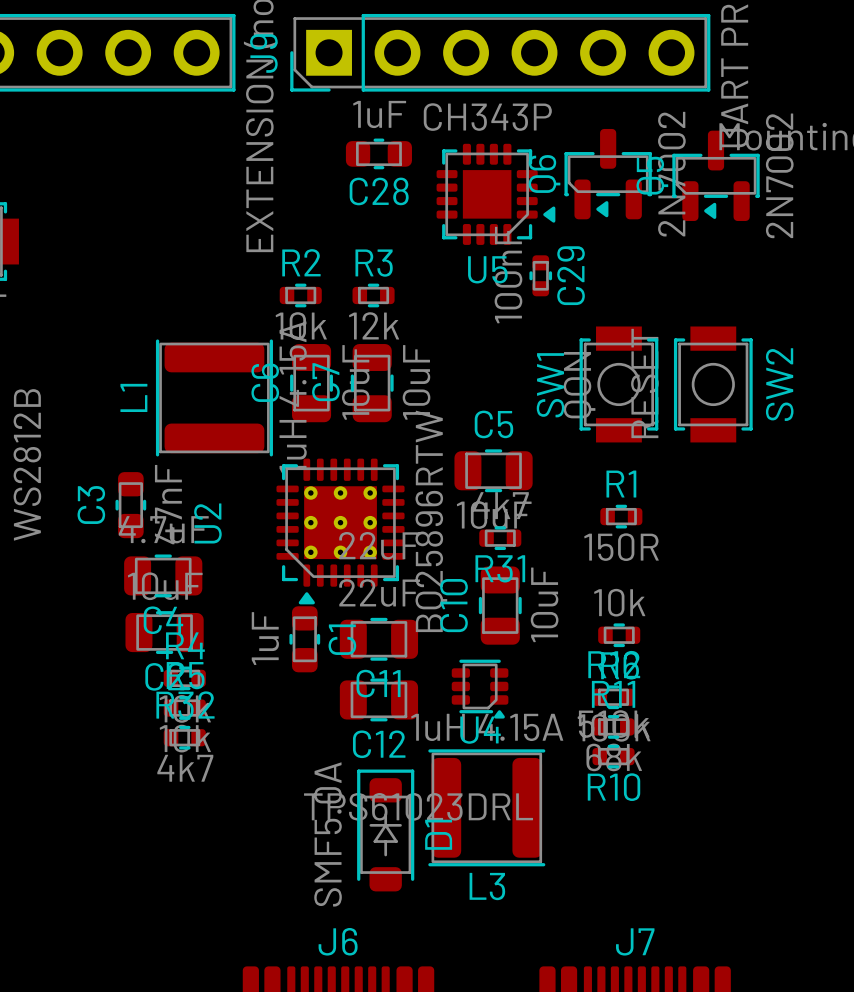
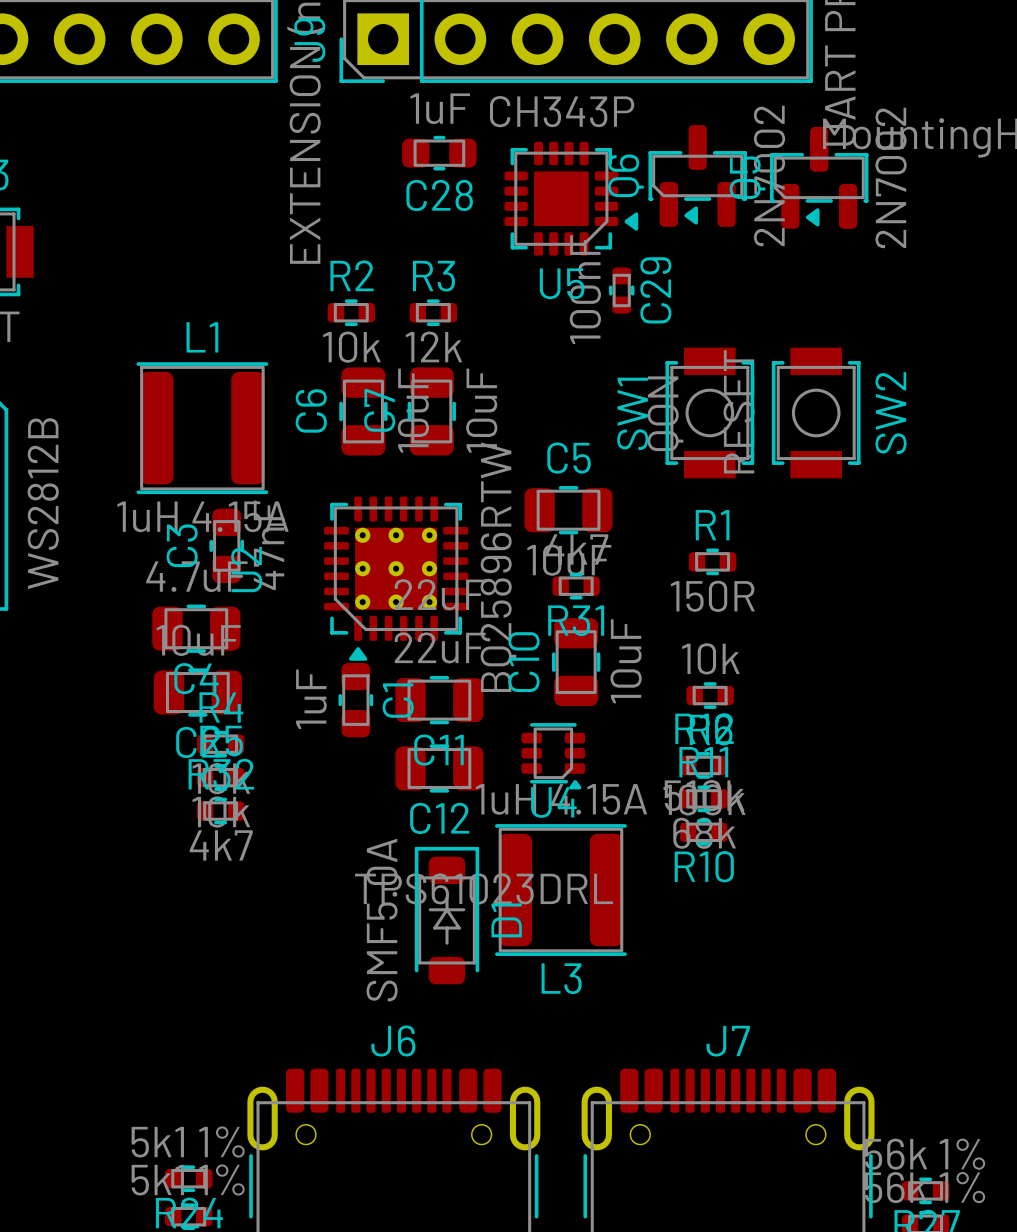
L1 rotation: 0° (214, 397) -> 90° clockwise (202, 428)
C3 position: (130, 505) -> (226, 545)

